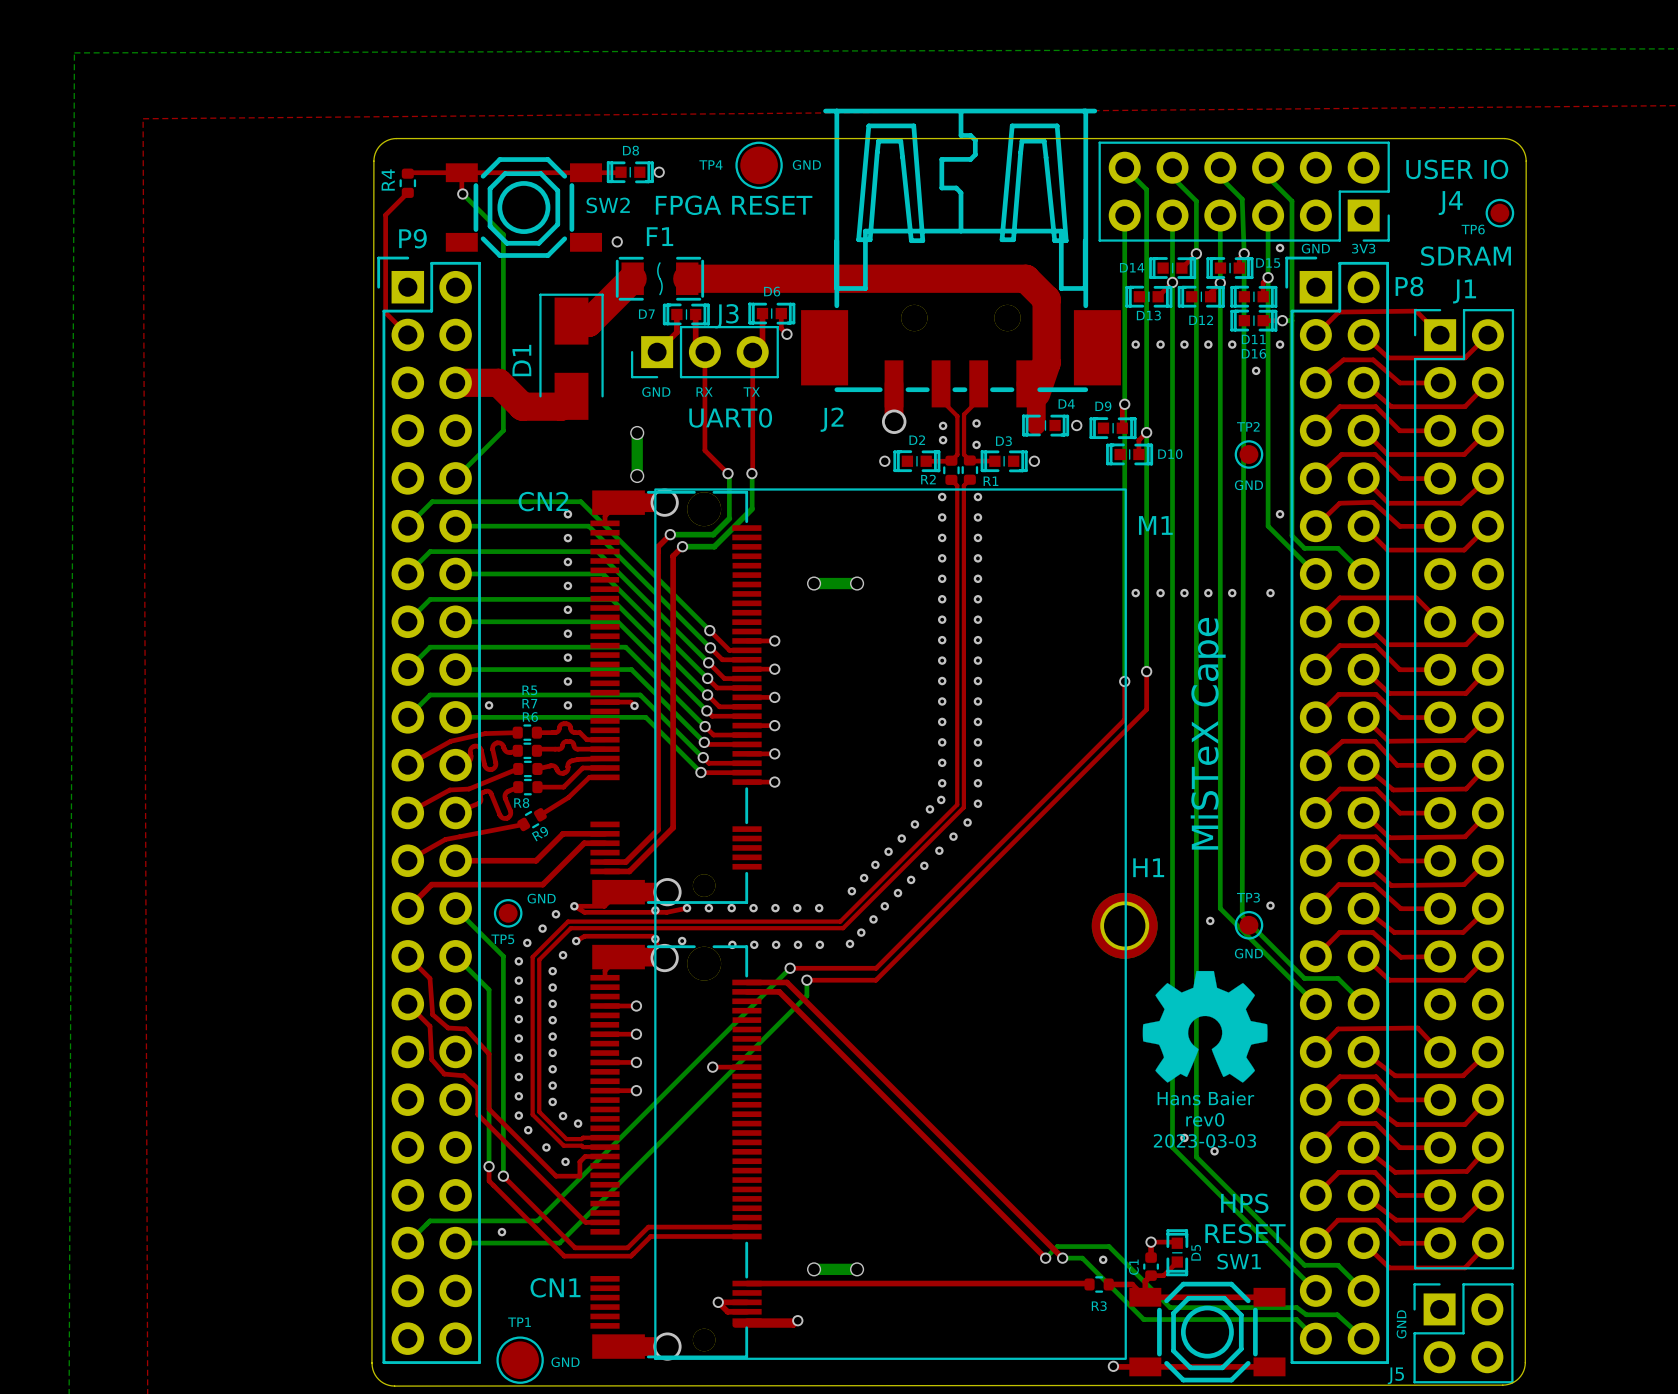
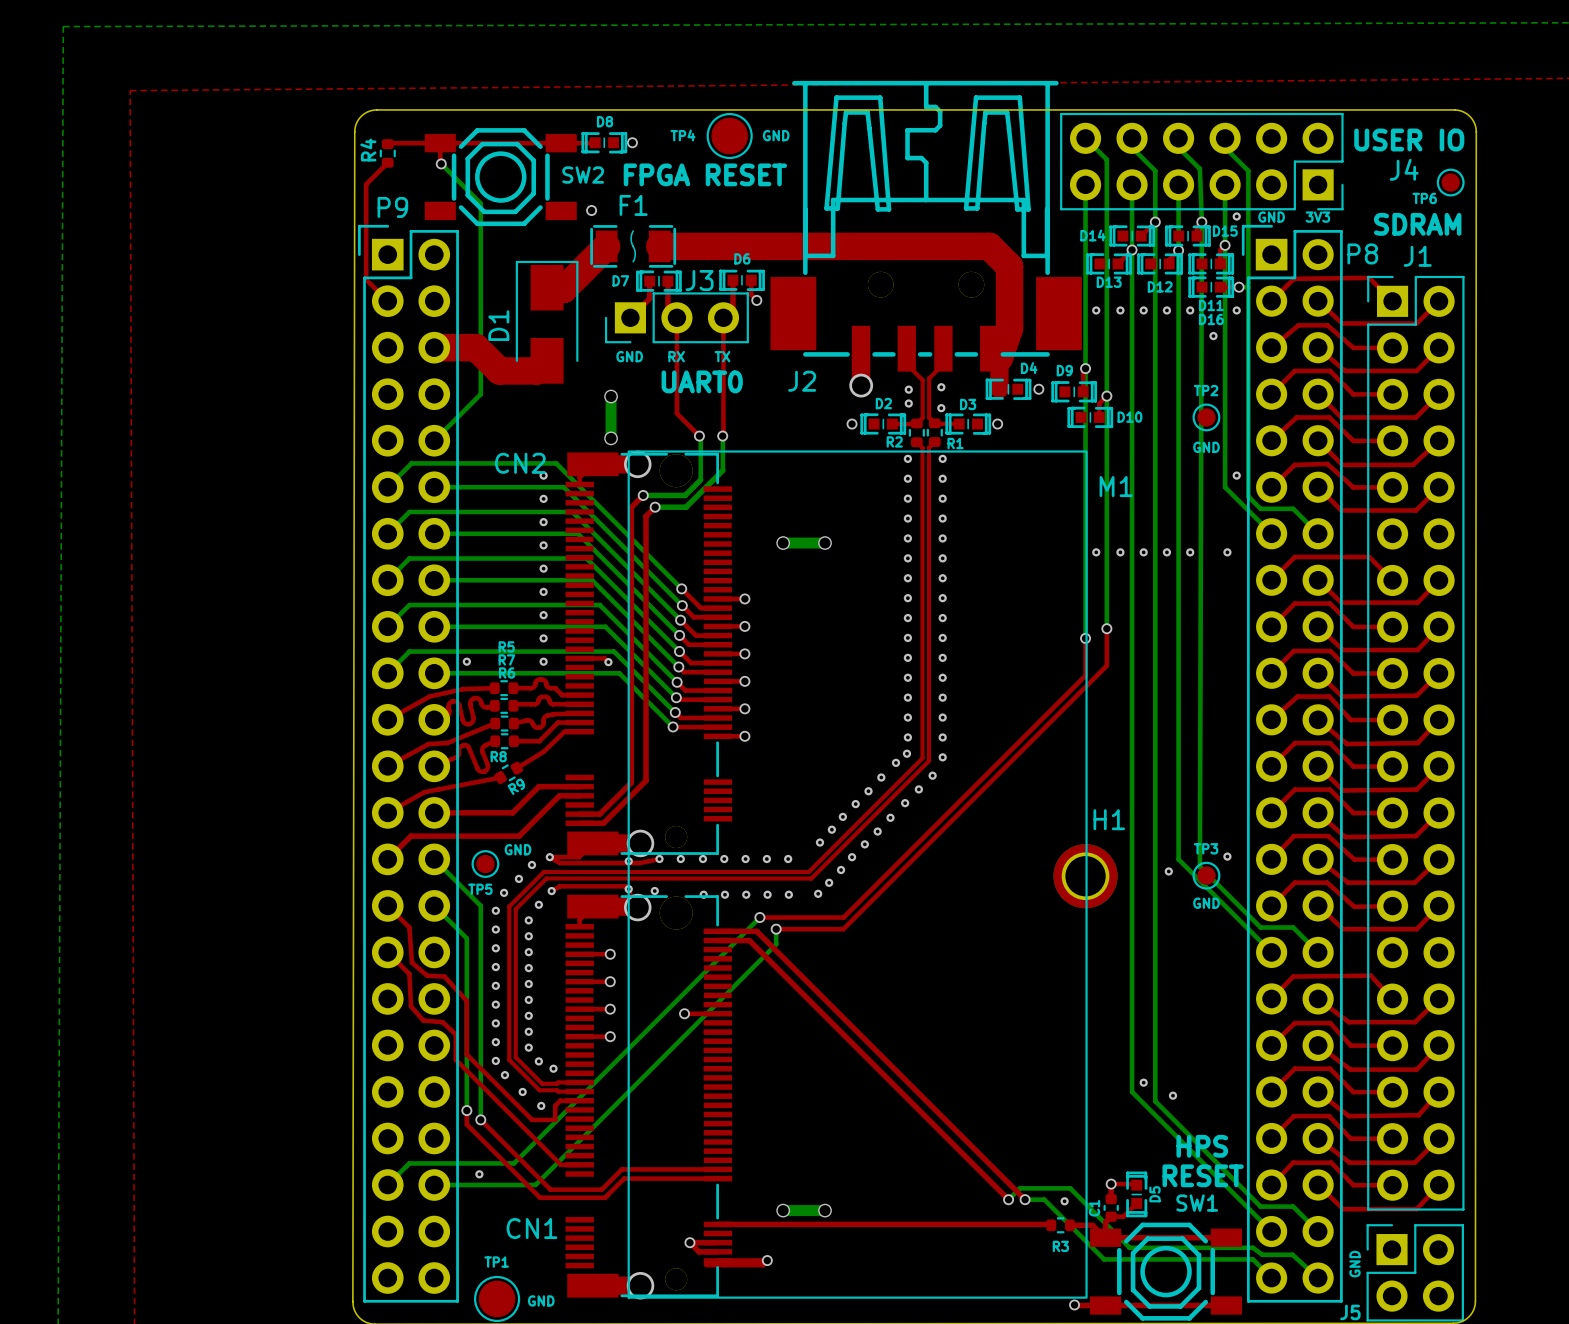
text: MiSTeX Cape (1208, 733) -> none
drawing: [1142, 970, 1268, 1083] -> none
text: Hans Baier (1205, 1098) -> none
text: rev0 (1205, 1119) -> none
text: 2023-03-03 (1204, 1140) -> none

